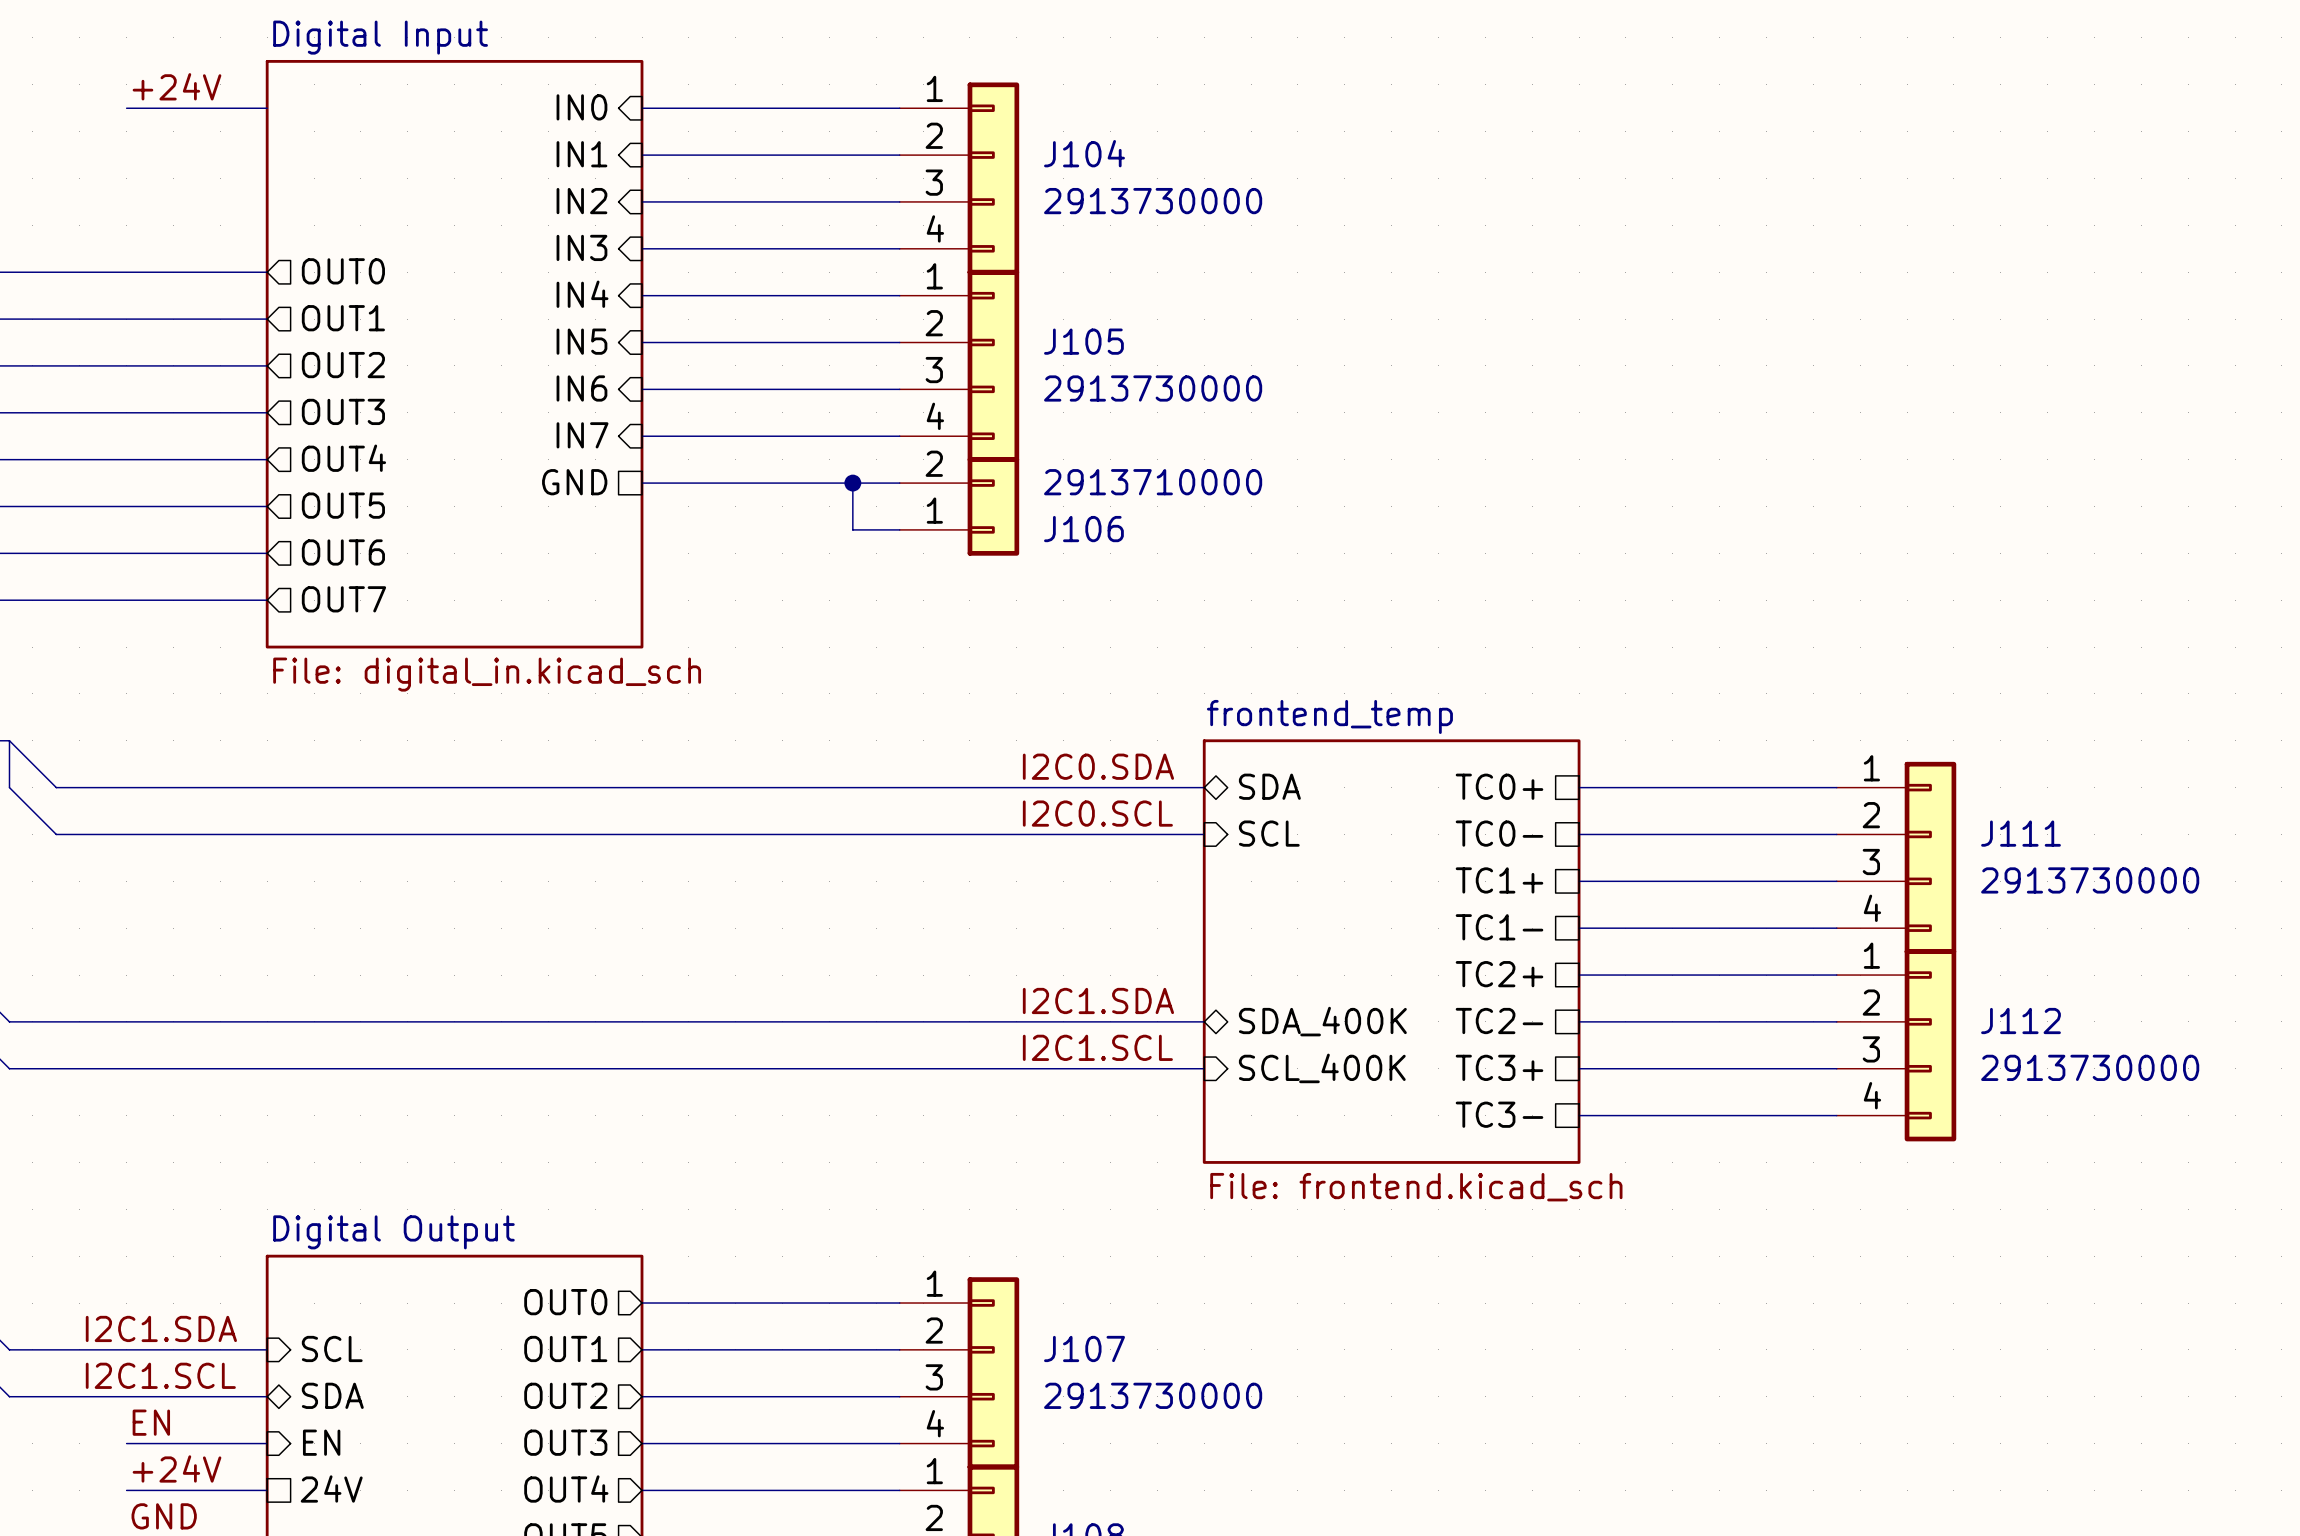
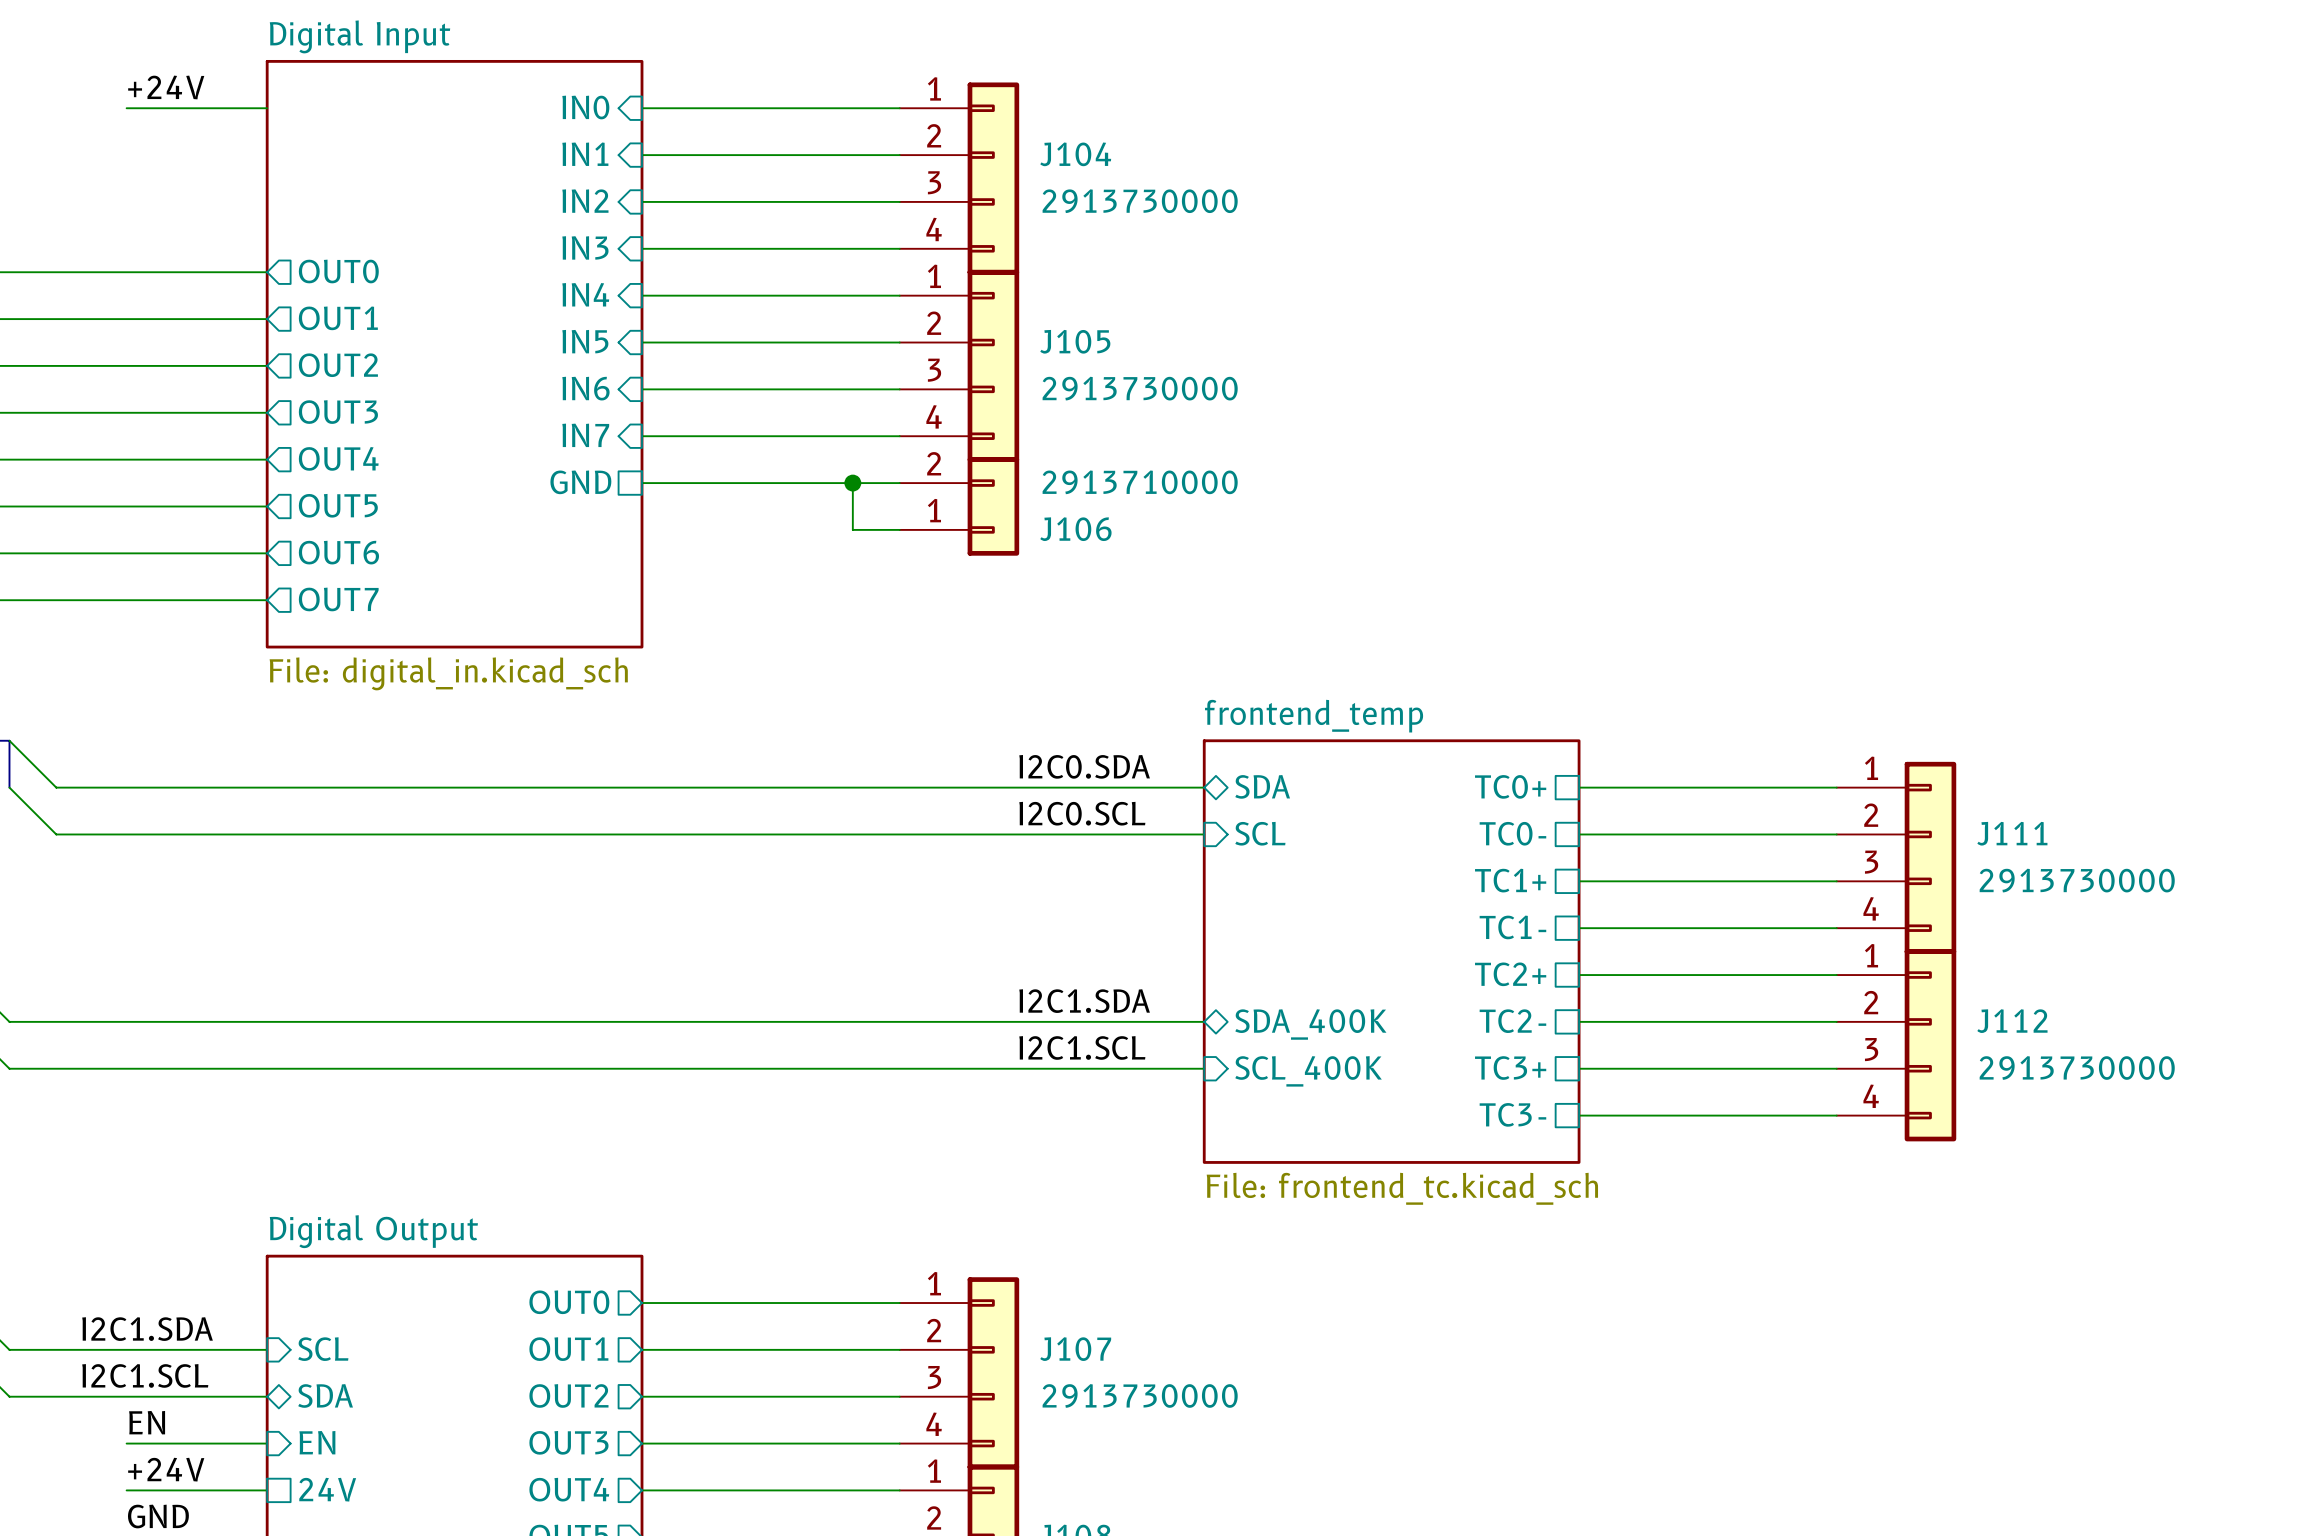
sheet frontend_temp value: File: frontend.kicad_sch (1416, 1187) -> File: frontend_tc.kicad_sch (1402, 1188)

